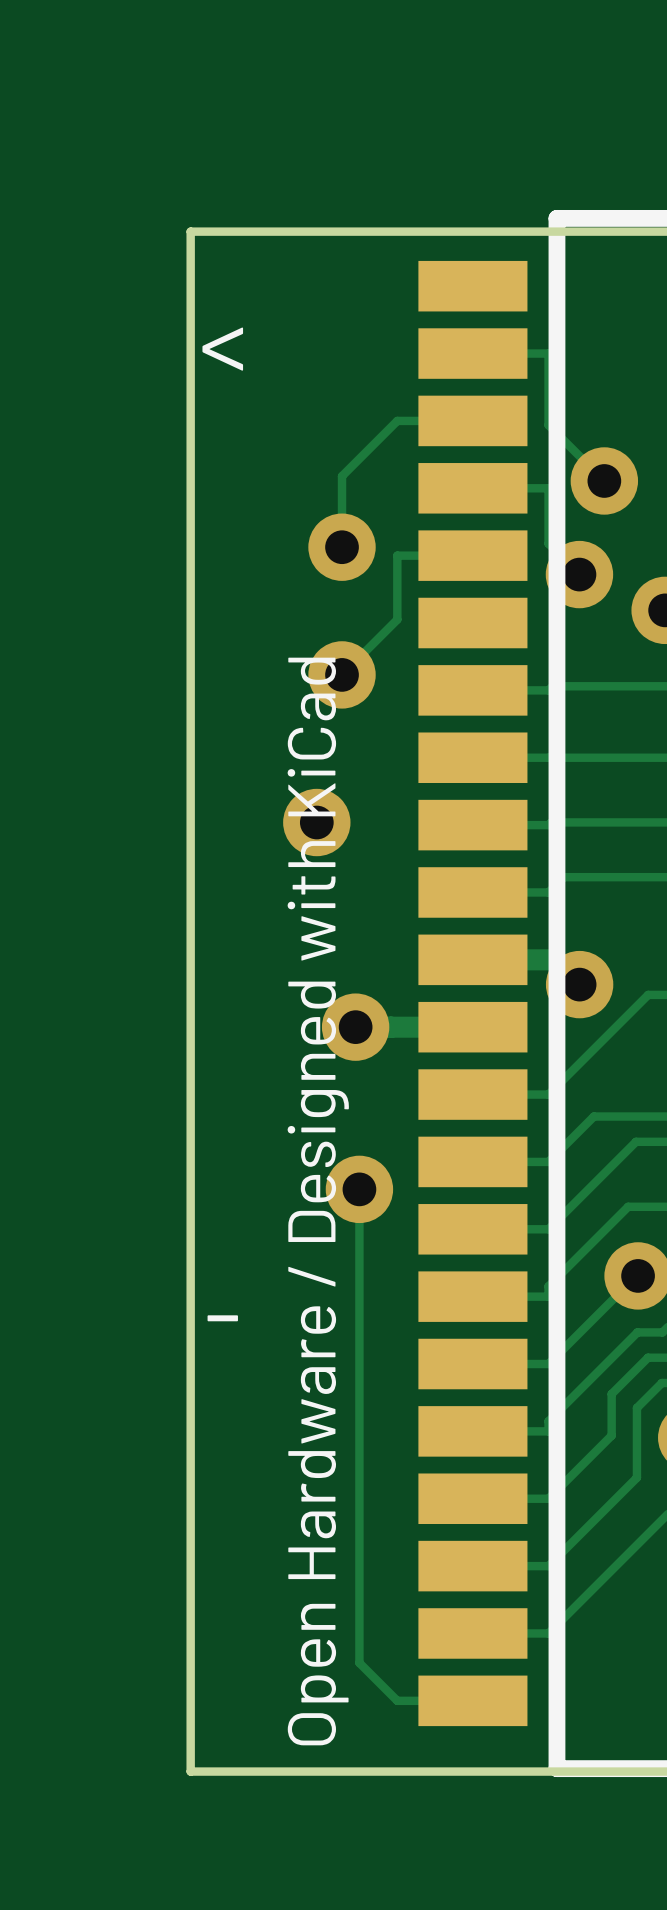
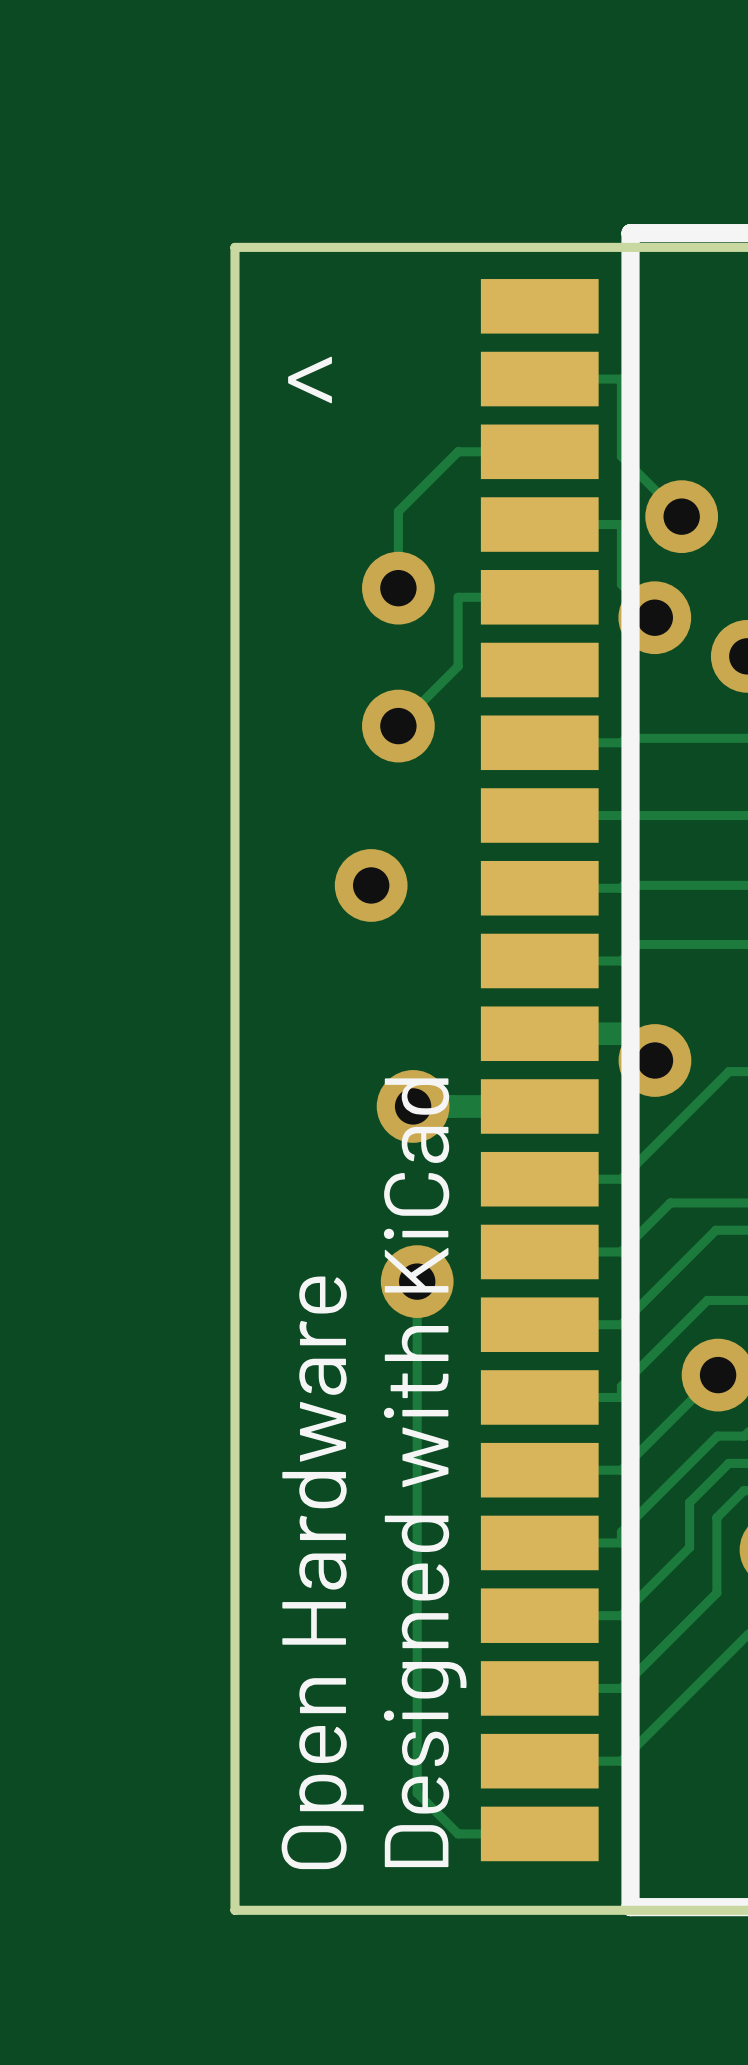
text position: < (222, 349) -> < (310, 380)
text: Open Hardware / Designed with KiCad (318, 1201) -> Designed with KiCad (425, 1472)
text: - (222, 1318) -> none
text: none -> Open Hardware (322, 1572)

